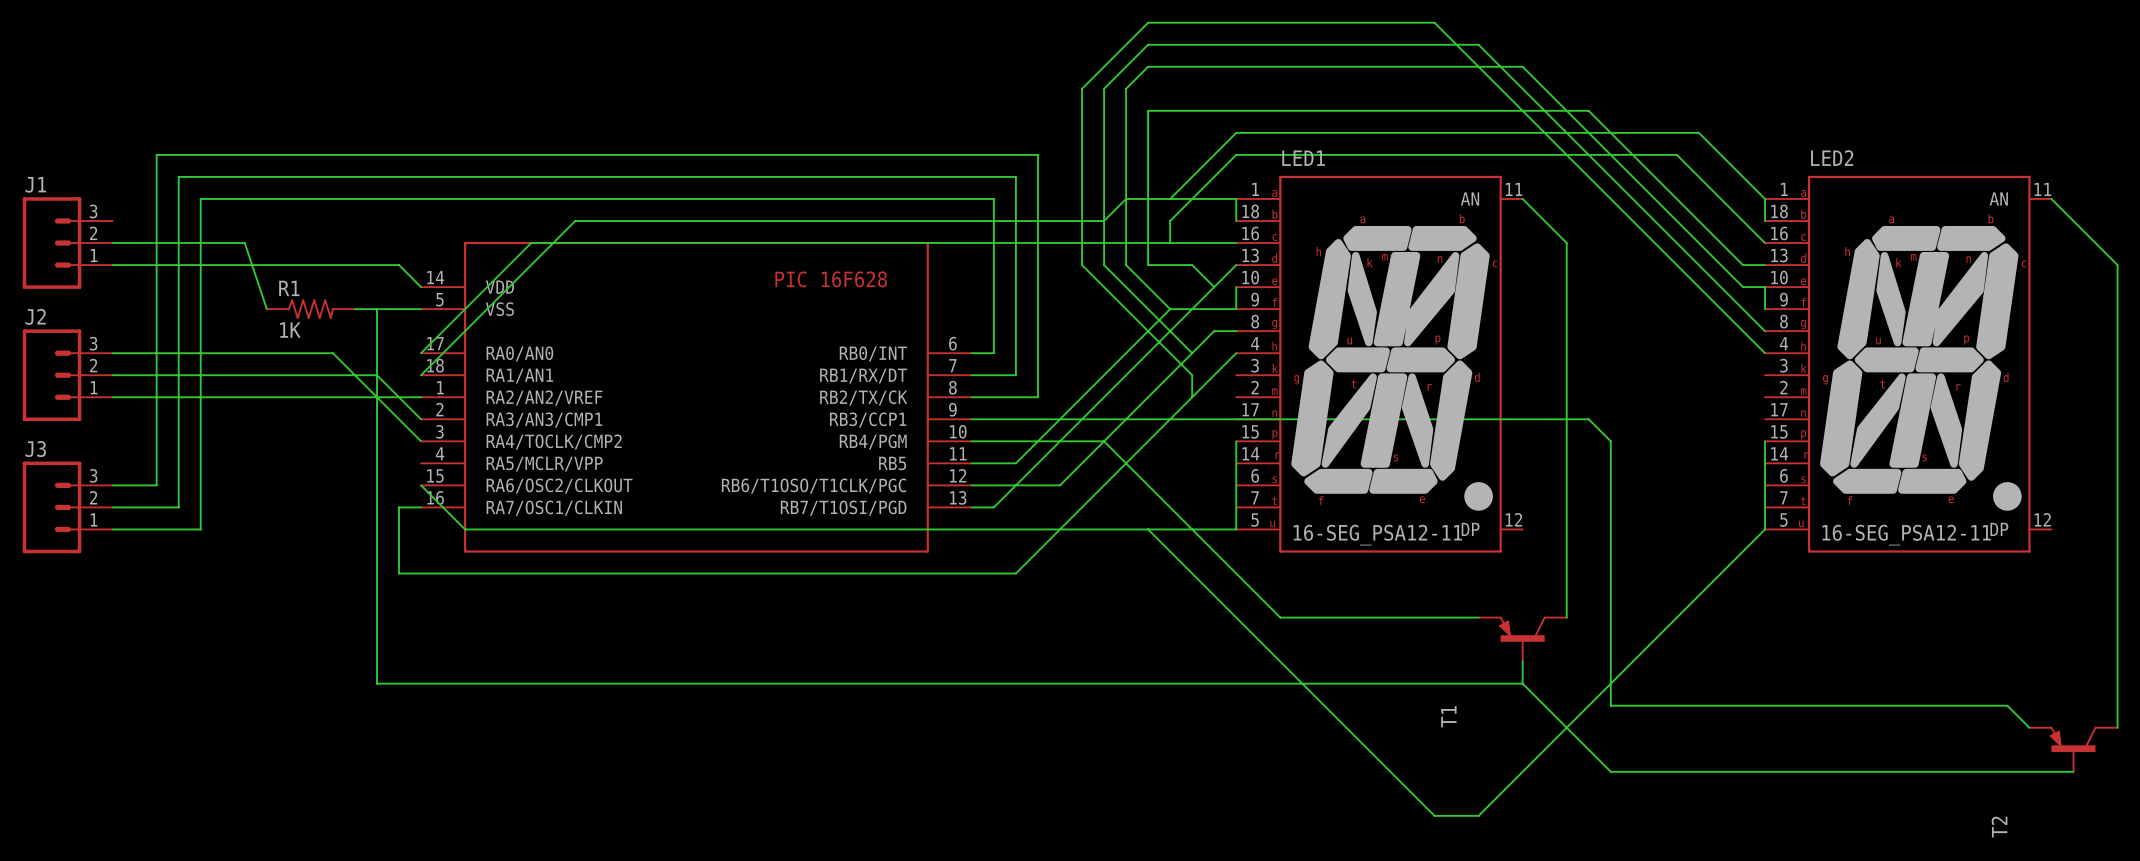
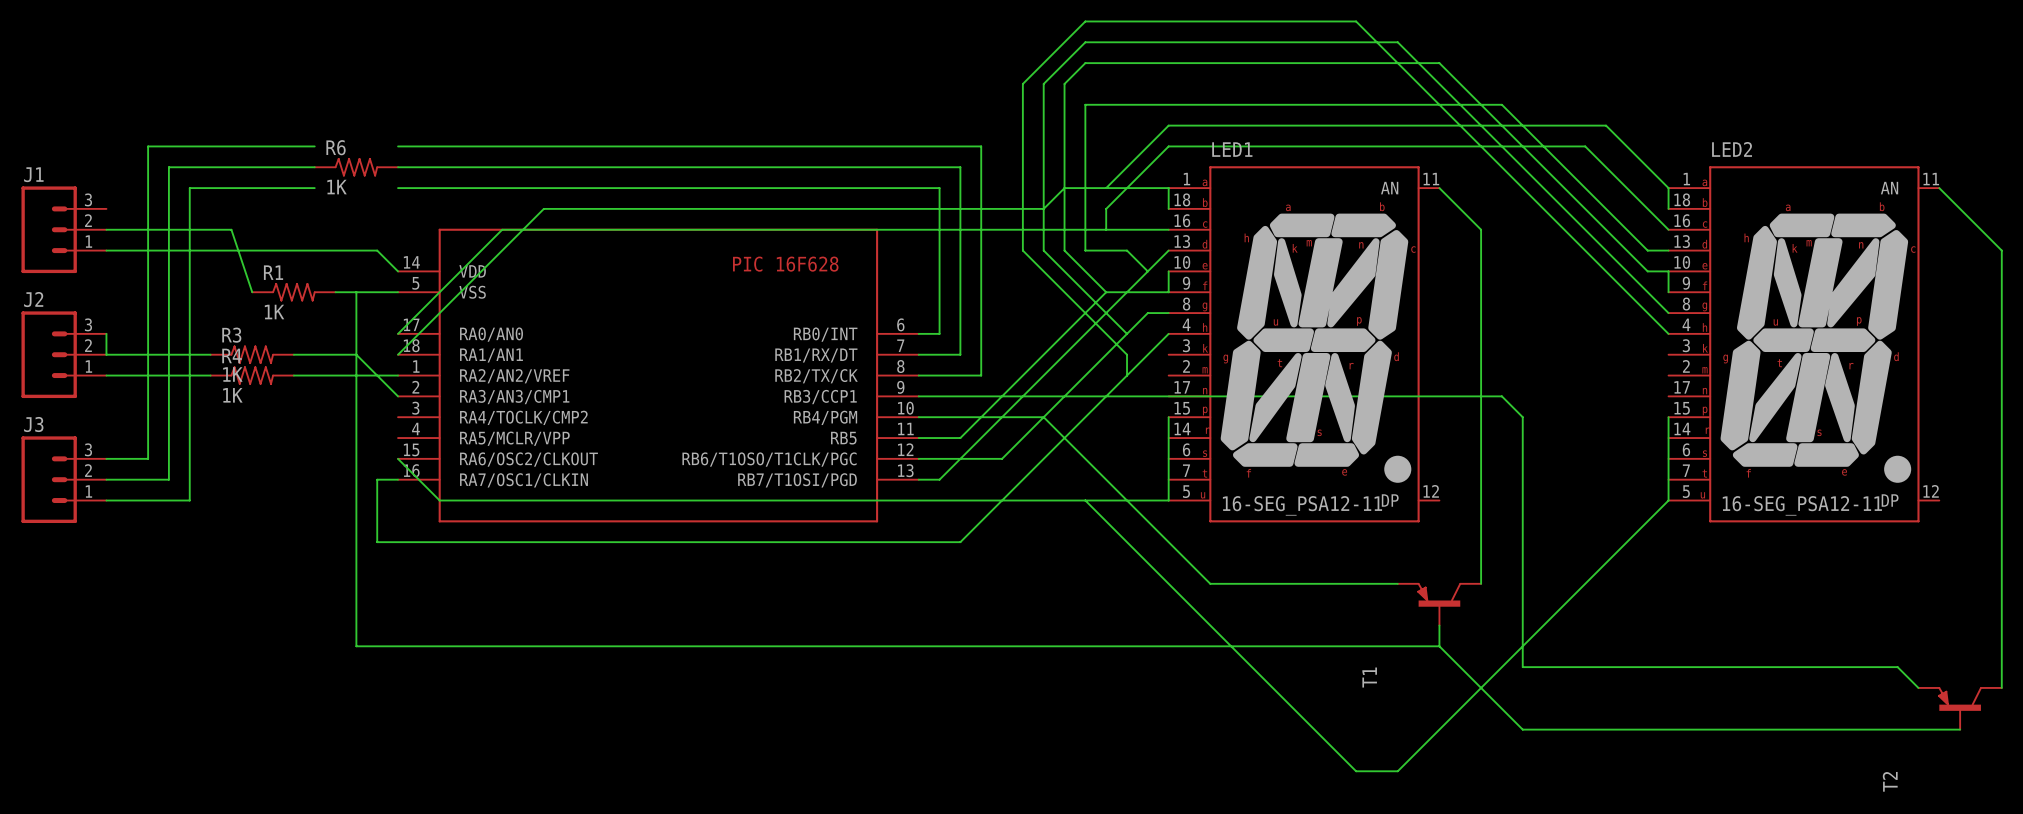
wire: (332, 154) (421, 154) -> none
R6: none -> 1K (356, 167)
wire: (332, 198) (421, 198) -> none
wire: (112, 353) (332, 353) (421, 441) -> (106, 333) (106, 354)
R3: none -> 1K (252, 354)
R4: none -> 1K (252, 375)

